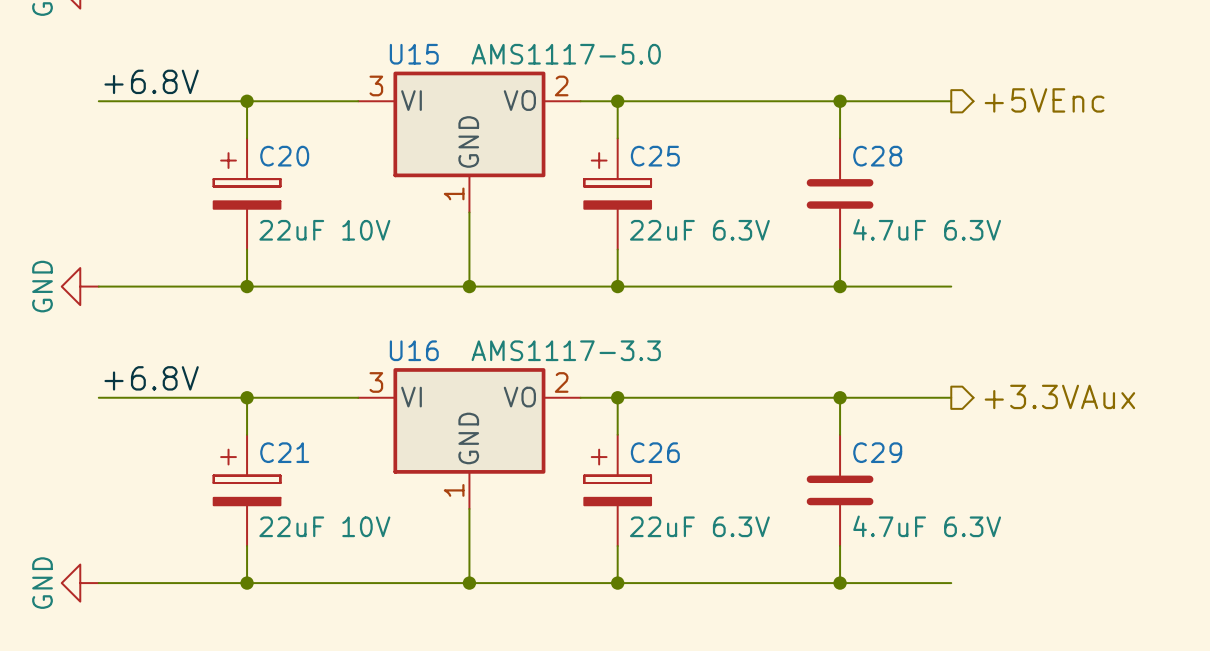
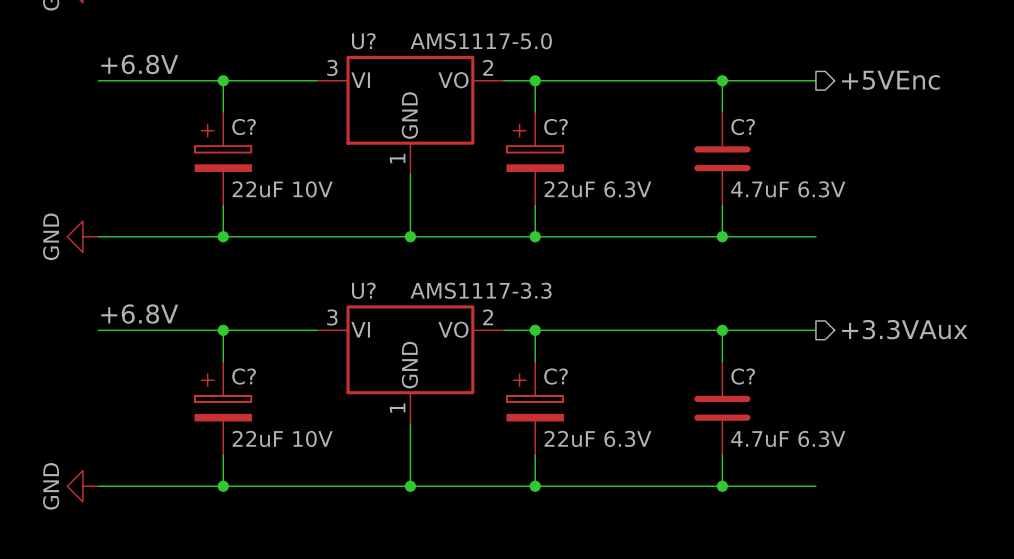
U15 name: U15 (414, 54) -> U? (363, 41)
C20 name: C20 (284, 156) -> C? (244, 127)
C25 name: C25 (655, 156) -> C? (556, 127)
C28 name: C28 (877, 156) -> C? (743, 127)
U16 name: U16 (414, 350) -> U? (363, 290)
C21 name: C21 (284, 452) -> C? (244, 376)
C26 name: C26 (655, 452) -> C? (556, 376)
C29 name: C29 (877, 452) -> C? (743, 376)

